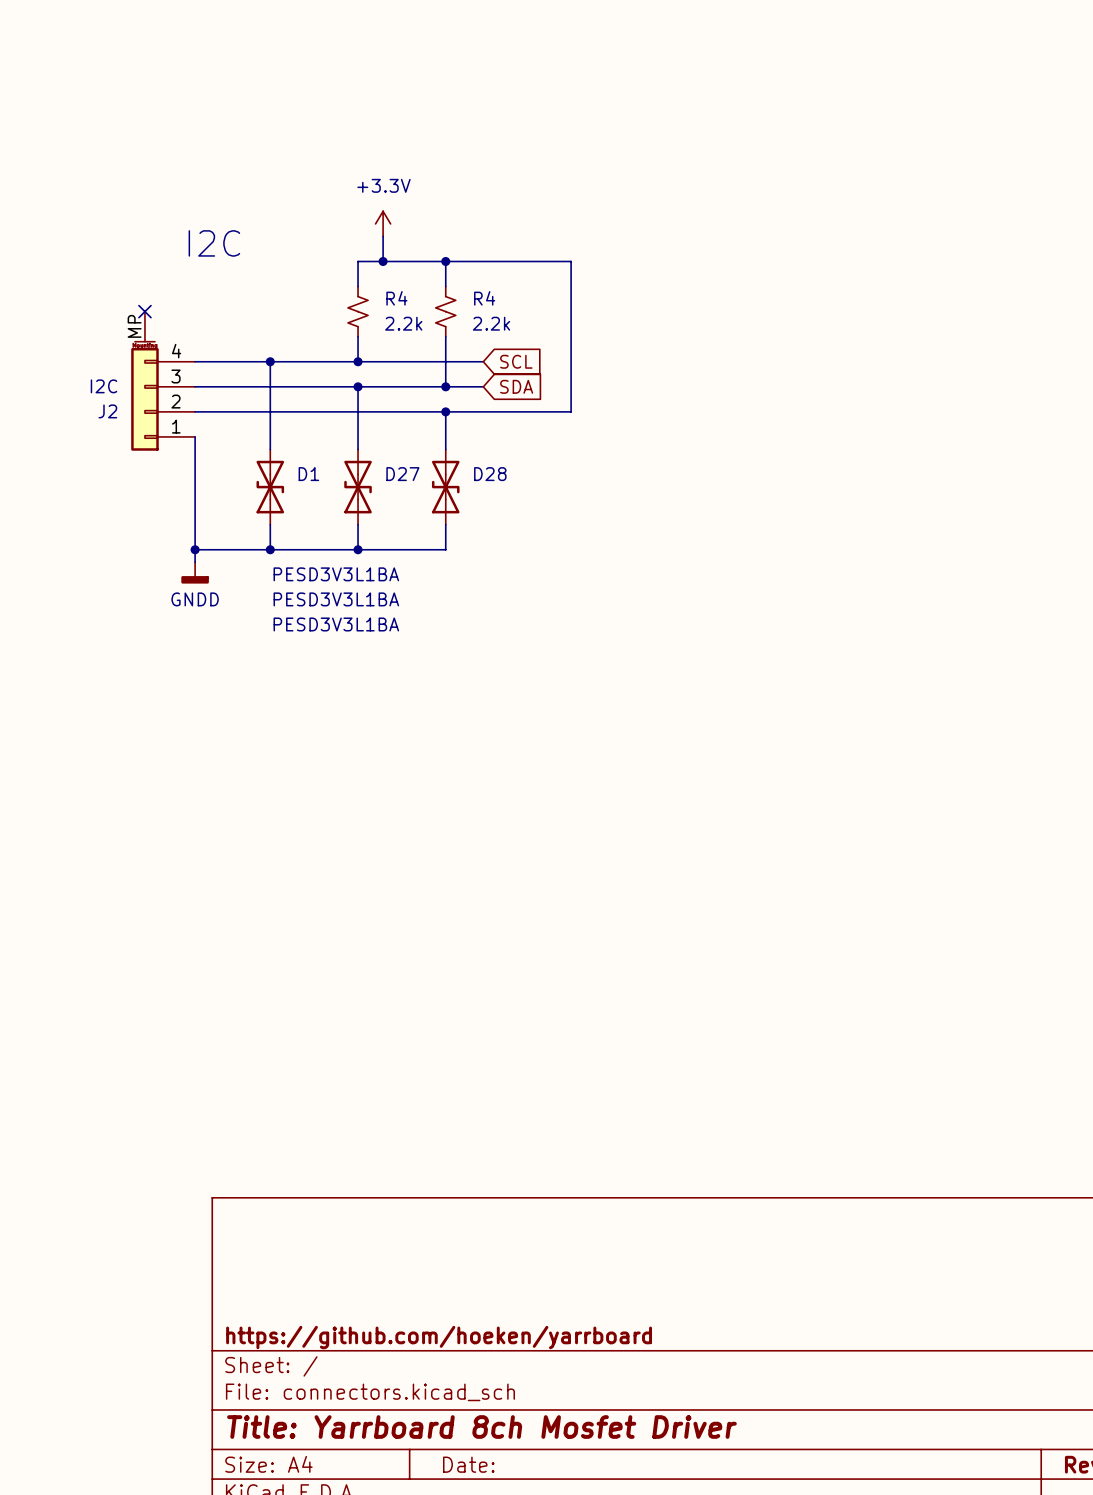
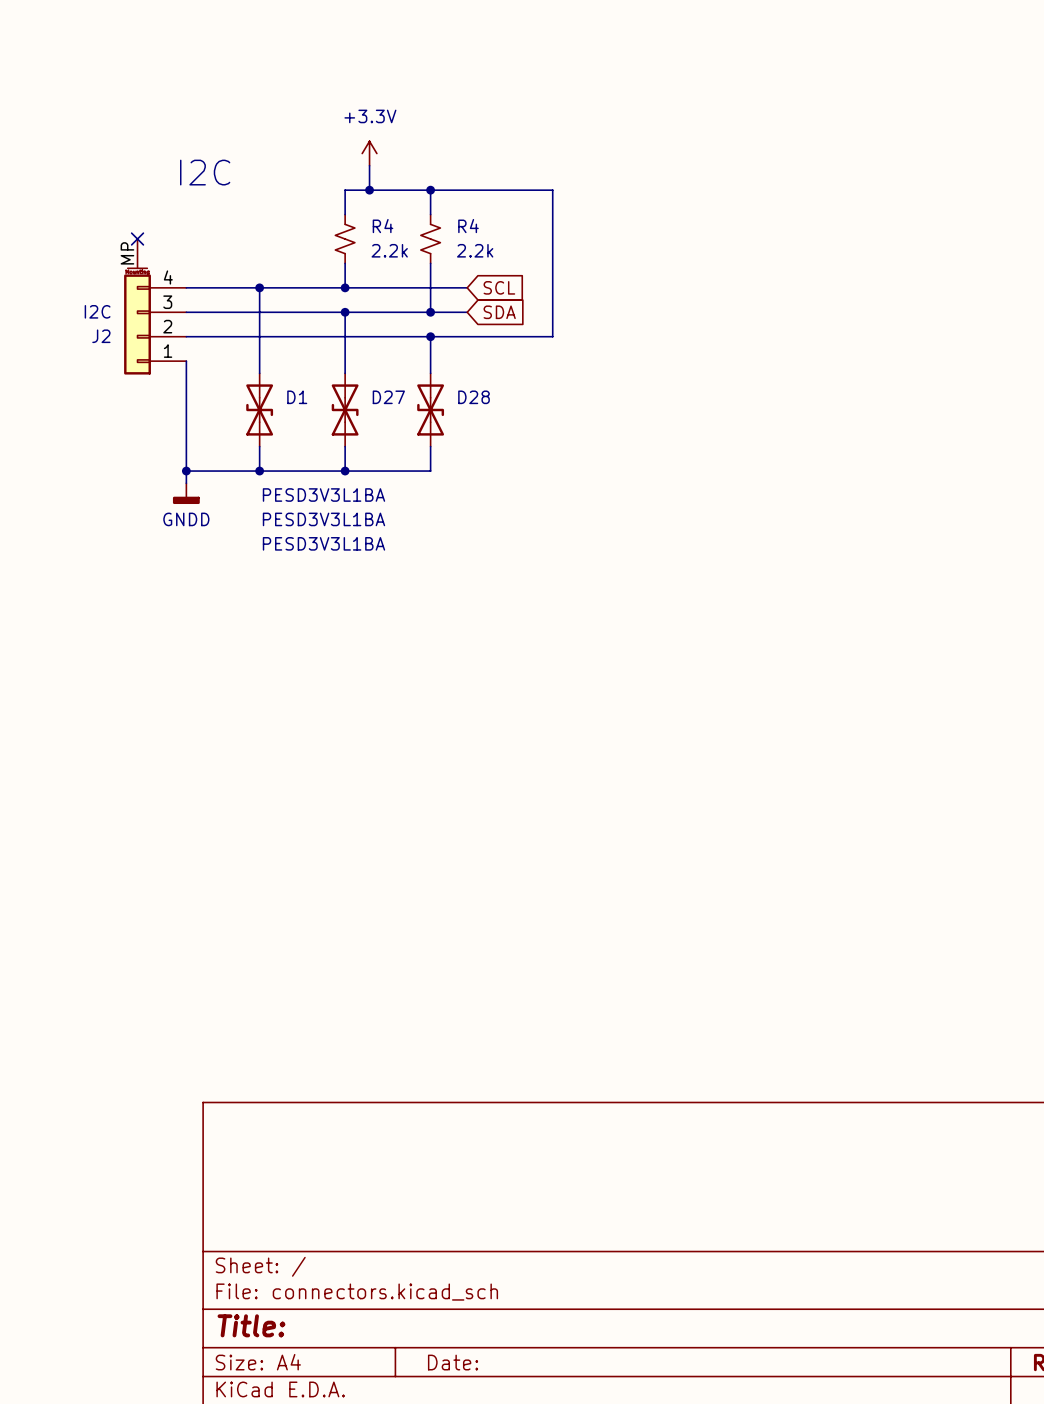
title block: https://github.com/hoeken/yarrboard (439, 1337) -> none
title block: Title: Yarrboard 8ch Mosfet Driver (481, 1427) -> Title: (251, 1325)

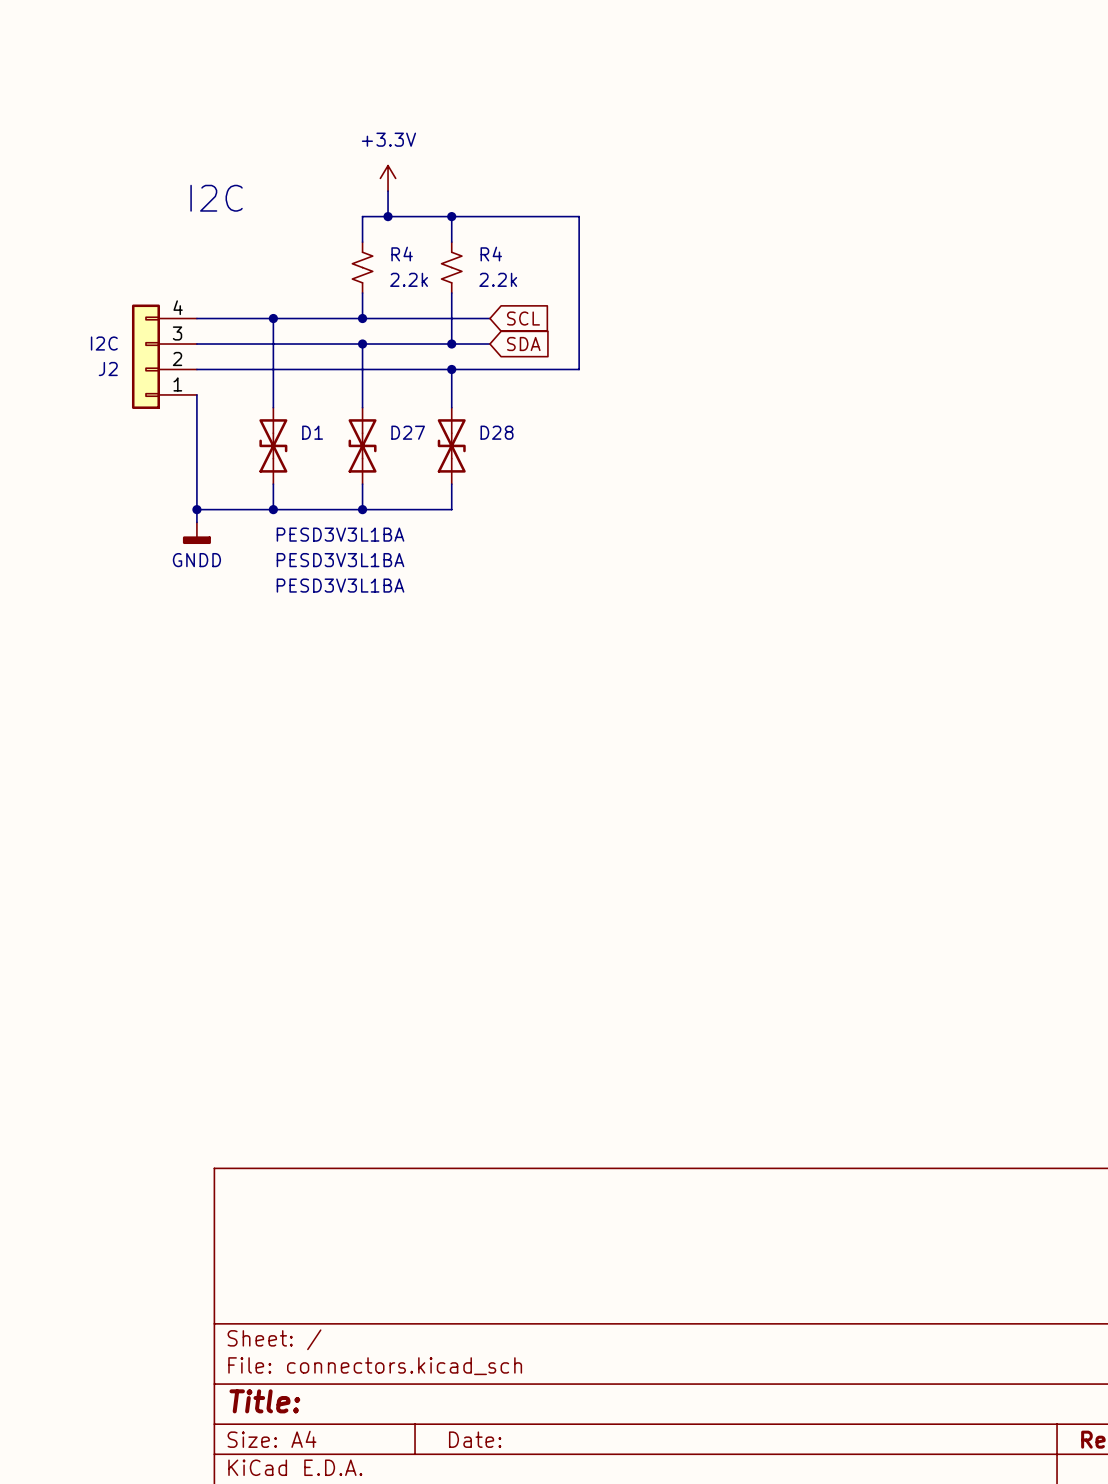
J2 symbol: [124, 239, 187, 375] -> [131, 304, 197, 409]
no-connect mark: (137, 239) -> none

